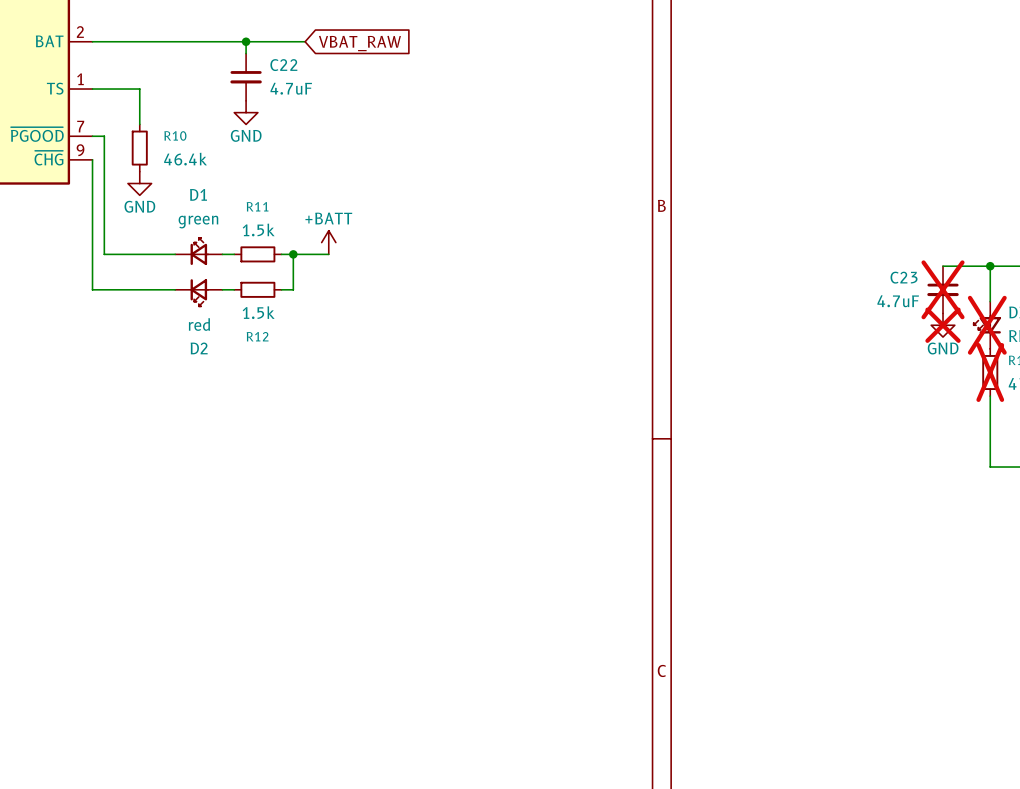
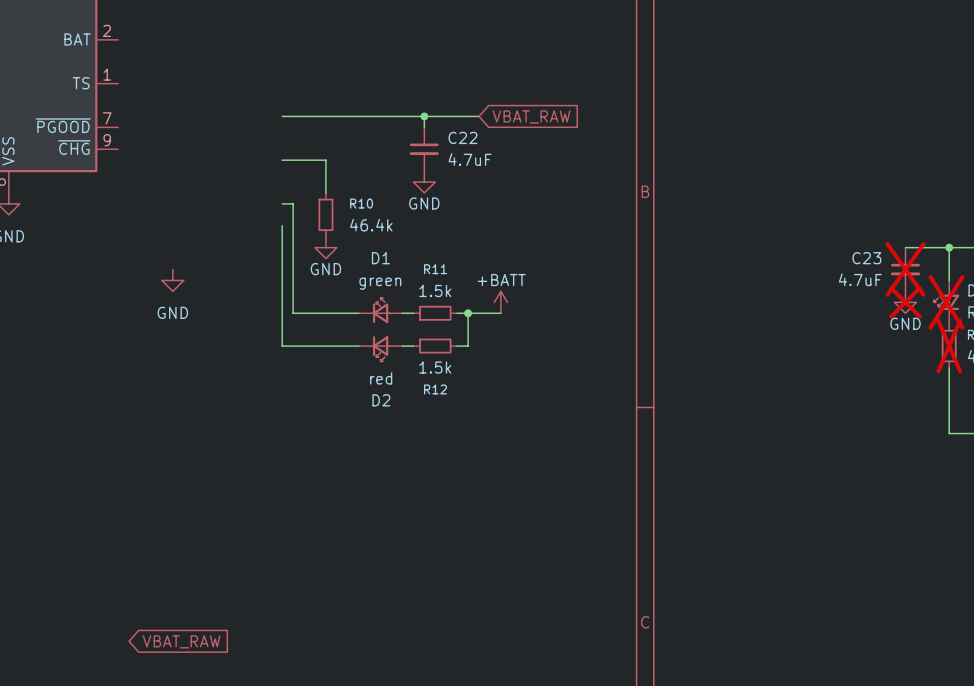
wire: (92, 41) (305, 41) -> (282, 116) (479, 116)
wire: (246, 41) (246, 53) -> (424, 116) (424, 127)
junction: (246, 41) -> none
global label position: VBAT_RAW (359, 43) -> VBAT_RAW (531, 116)
C22 position: (246, 77) -> (424, 149)
wire: (92, 89) (139, 89) (139, 124) -> (282, 160) (325, 160) (325, 192)
power symbol: GND (246, 112) -> none
junction: none -> (424, 116)
wire: (92, 136) (104, 136) (104, 254) (175, 254) -> (282, 203) (293, 203) (293, 313) (358, 313)
R10 position: (139, 148) -> (325, 214)
wire: (92, 159) (92, 289) (175, 289) -> (282, 225) (282, 346) (358, 346)
power symbol: GND (139, 183) -> none
power symbol: none -> GND (424, 182)
power symbol position: +BATT (328, 242) -> +BATT (500, 302)
D1 position: (198, 251) -> (380, 310)
wire: (222, 254) (234, 254) -> (402, 313) (413, 313)
R11 position: (257, 254) -> (435, 313)
wire: (281, 254) (328, 254) -> (457, 313) (500, 313)
wire: (293, 254) (293, 289) (281, 289) -> (468, 313) (468, 346) (457, 346)
junction: (293, 254) -> none
power symbol: none -> GND (325, 247)
wire: (222, 289) (234, 289) -> (402, 346) (413, 346)
R12 position: (257, 289) -> (435, 346)
D2 position: (198, 292) -> (380, 348)
power symbol: none -> GND (172, 280)
junction: none -> (468, 313)
global label: none -> VBAT_RAW (181, 641)

